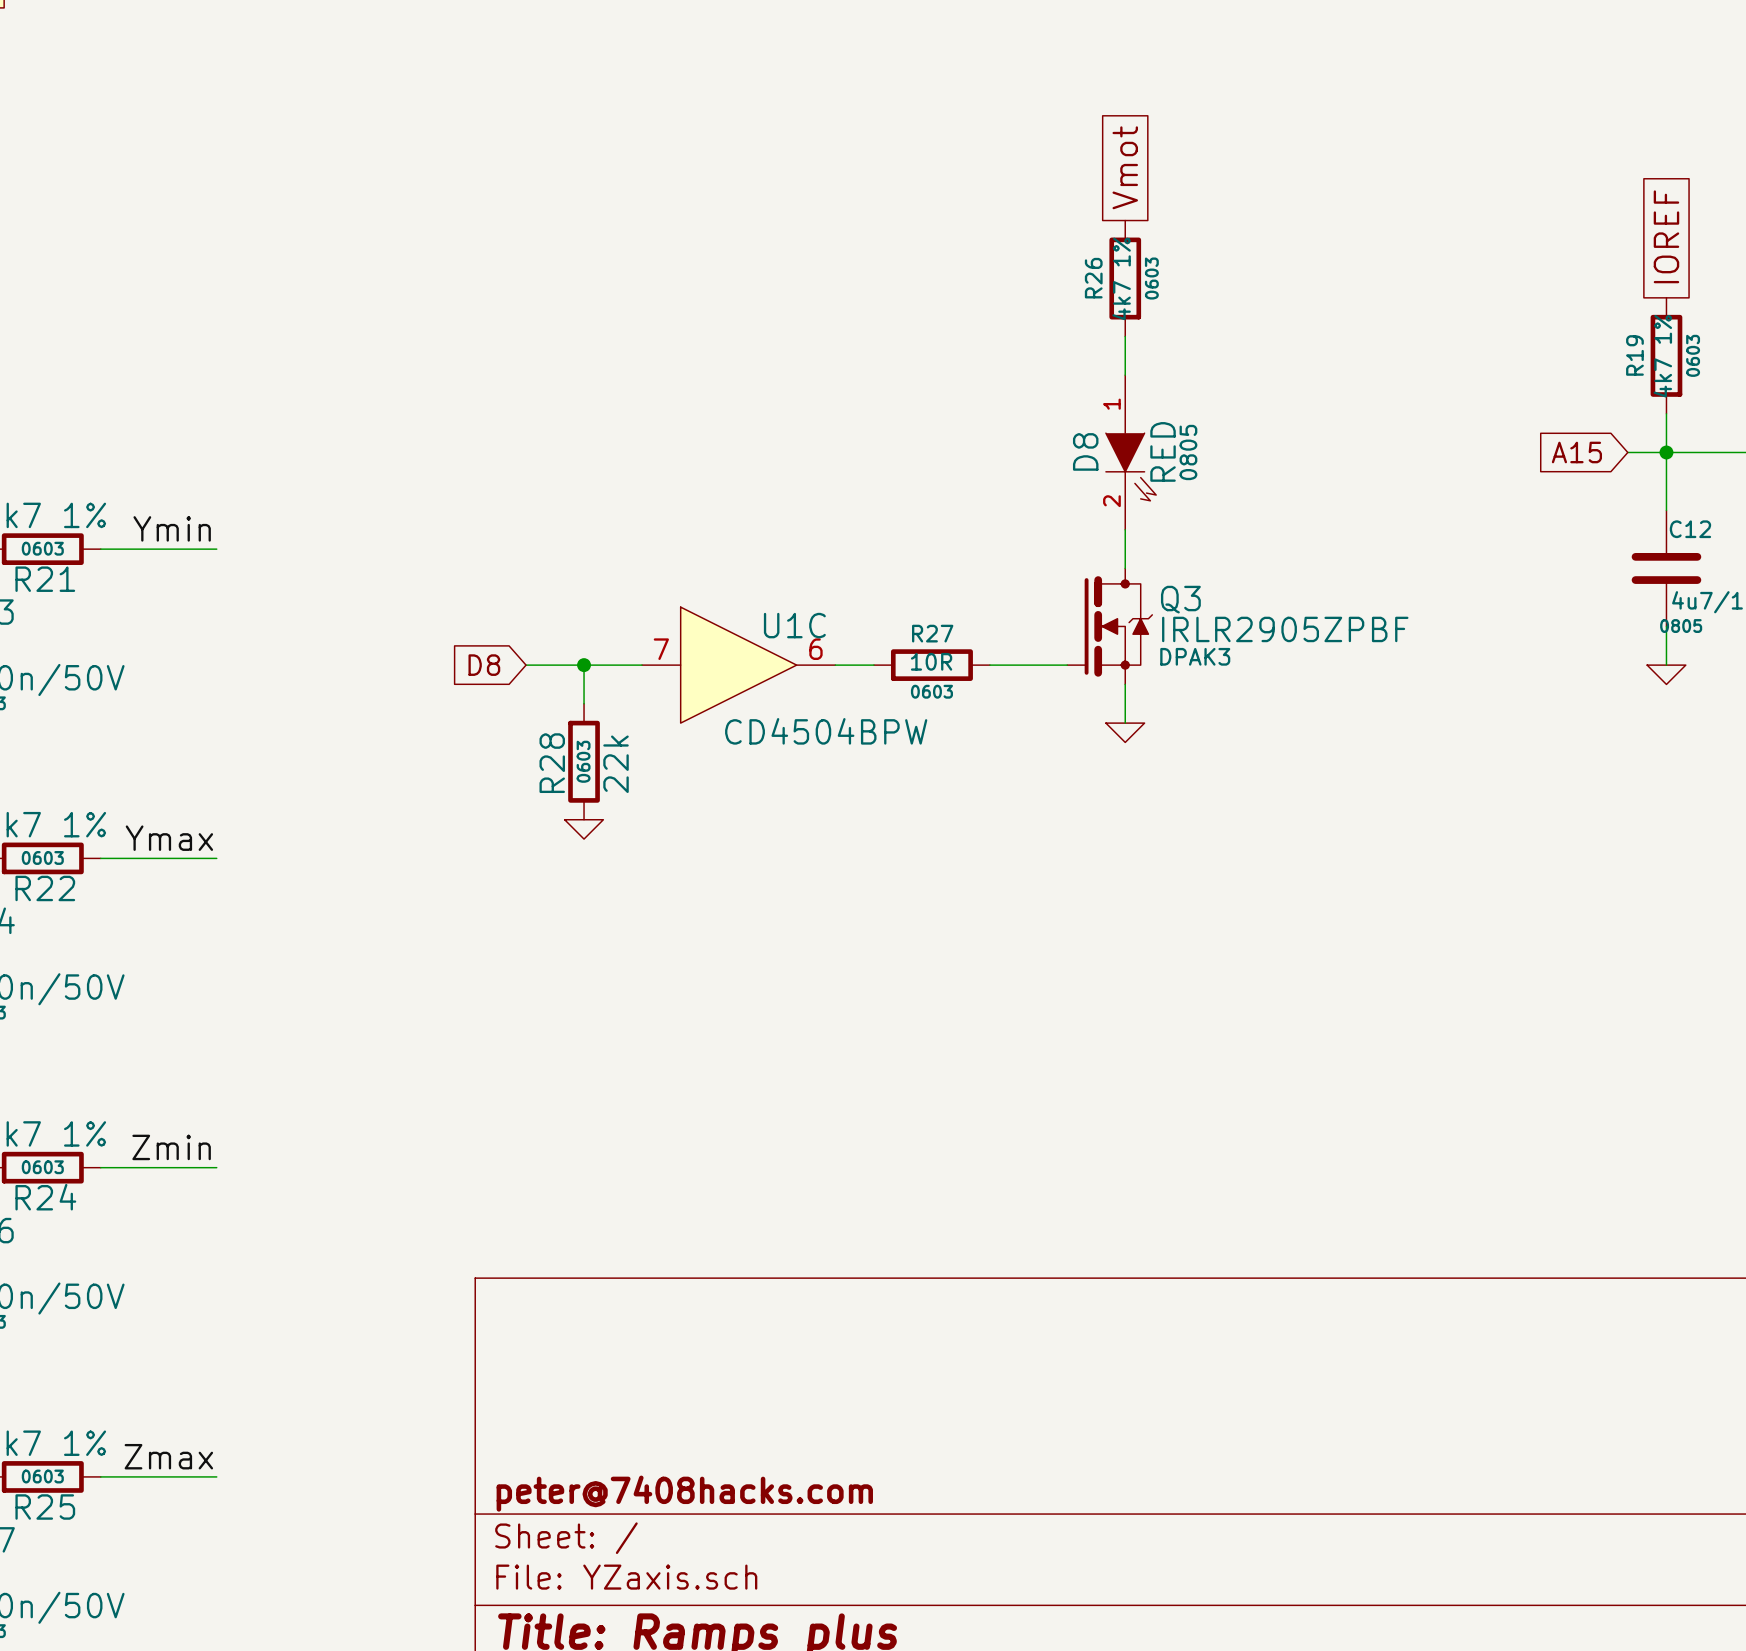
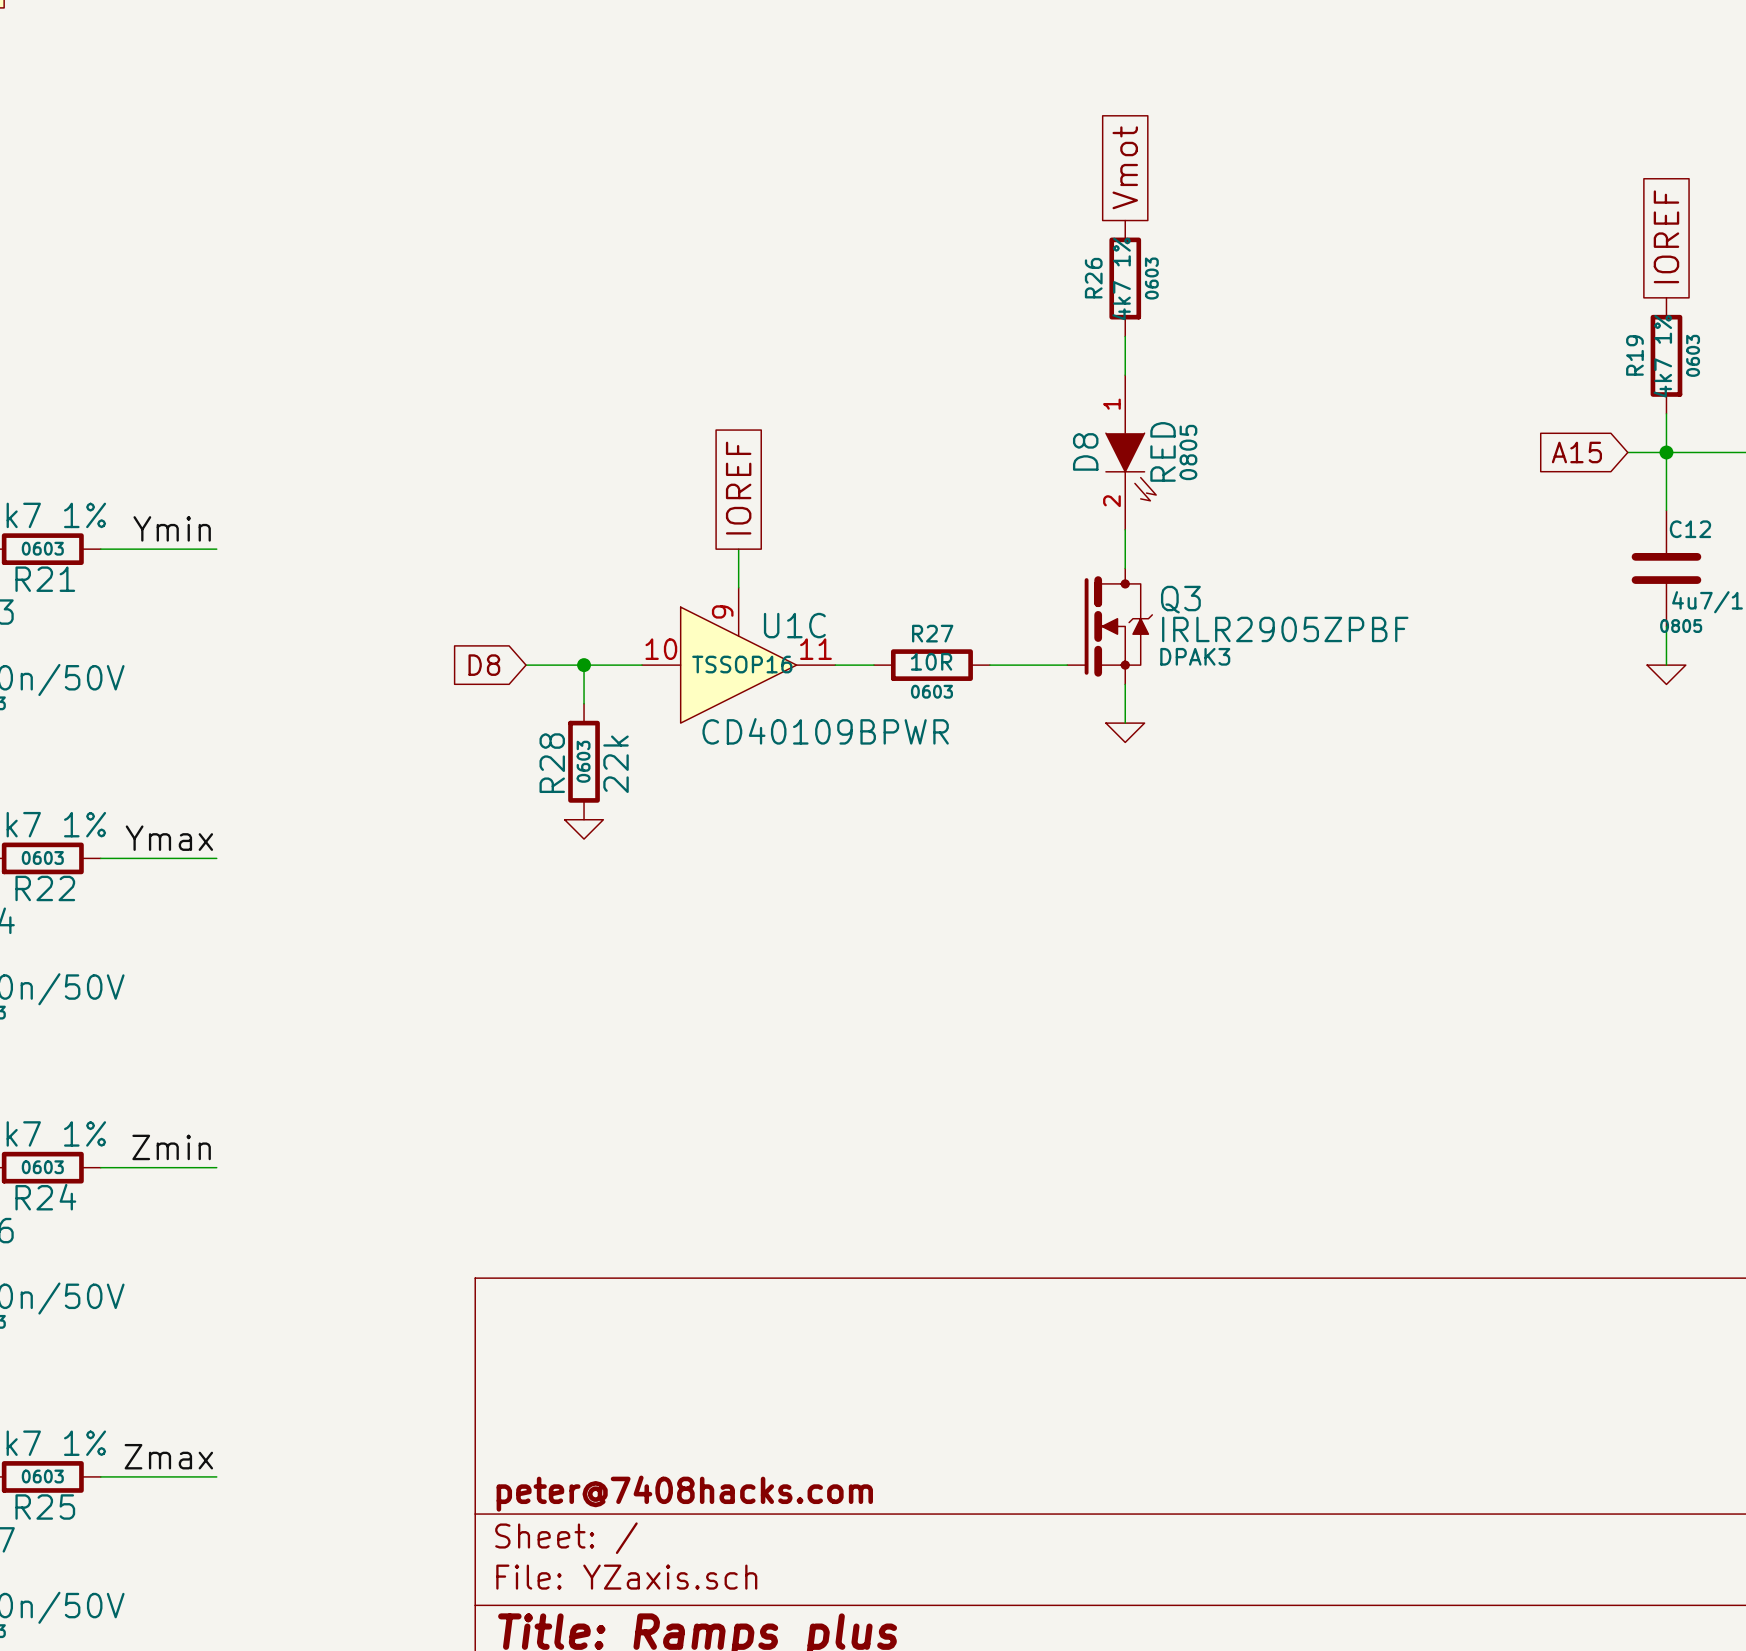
global label: none -> IOREF (738, 488)
wire: none -> (738, 549) (738, 587)
U1C symbol: [642, 607, 836, 724] -> [642, 587, 836, 724]
U1C text: none -> TSSOP16 (742, 664)
U1C value: CD4504BPW (826, 731) -> CD40109BPWR (825, 731)

